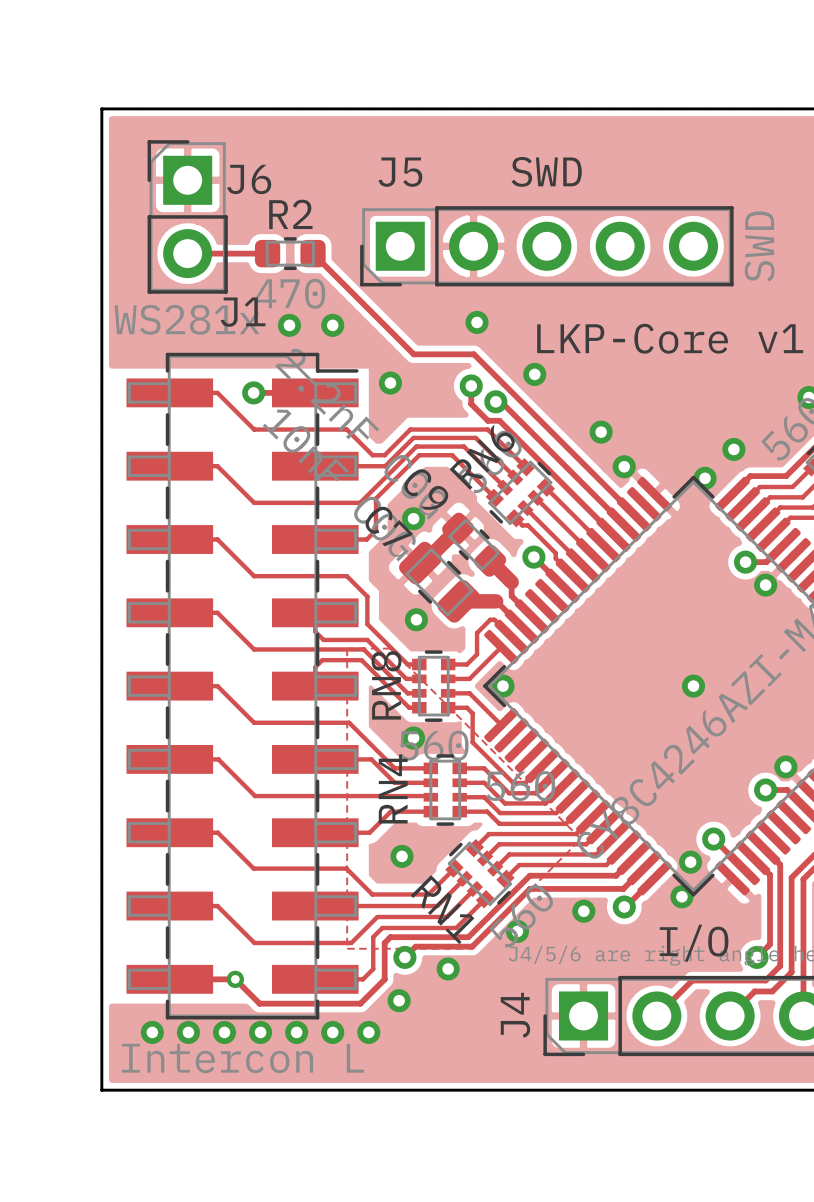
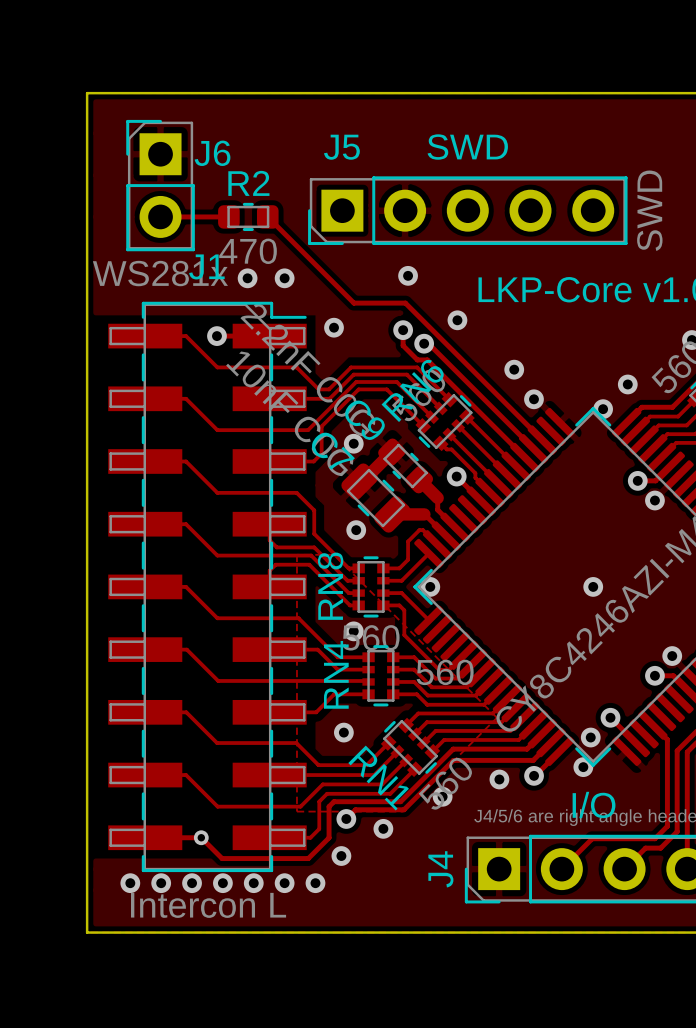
track: (752, 857) (770, 874) (770, 944) (756, 957) -> none
via: (756, 957) -> none

